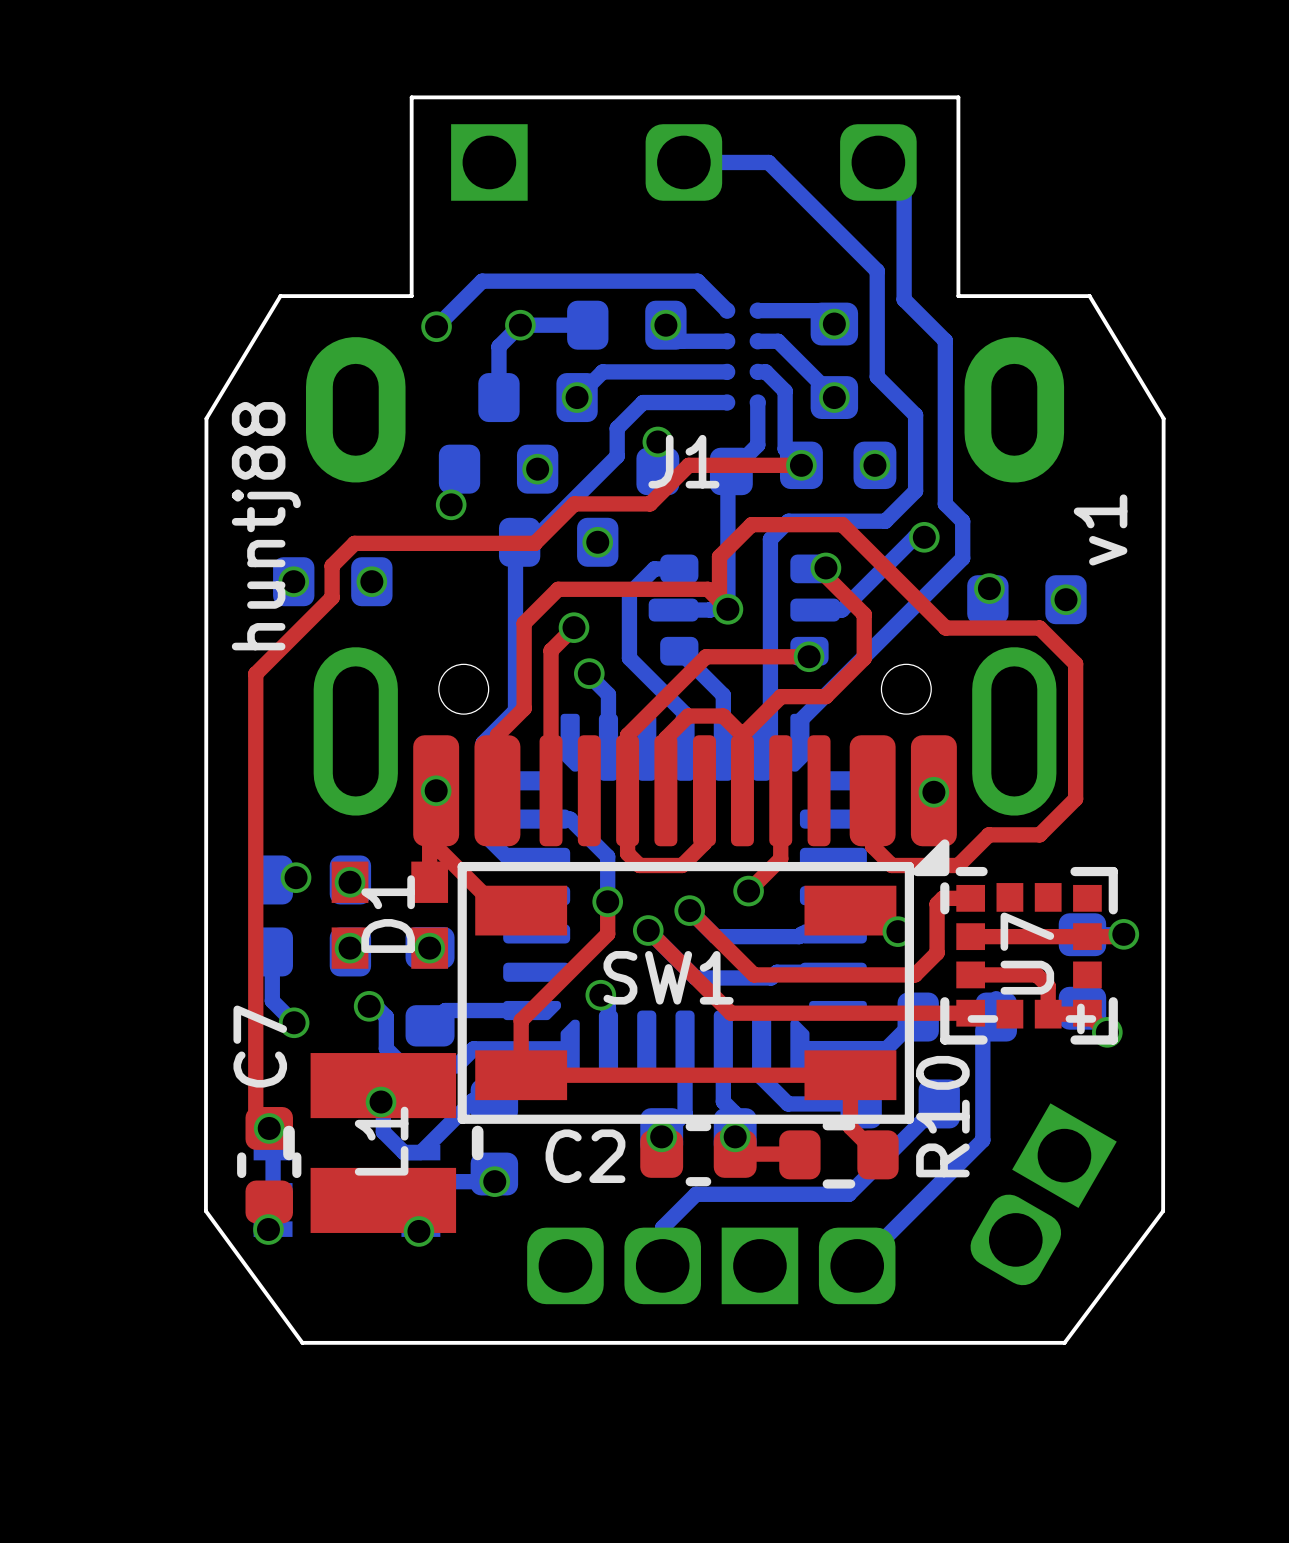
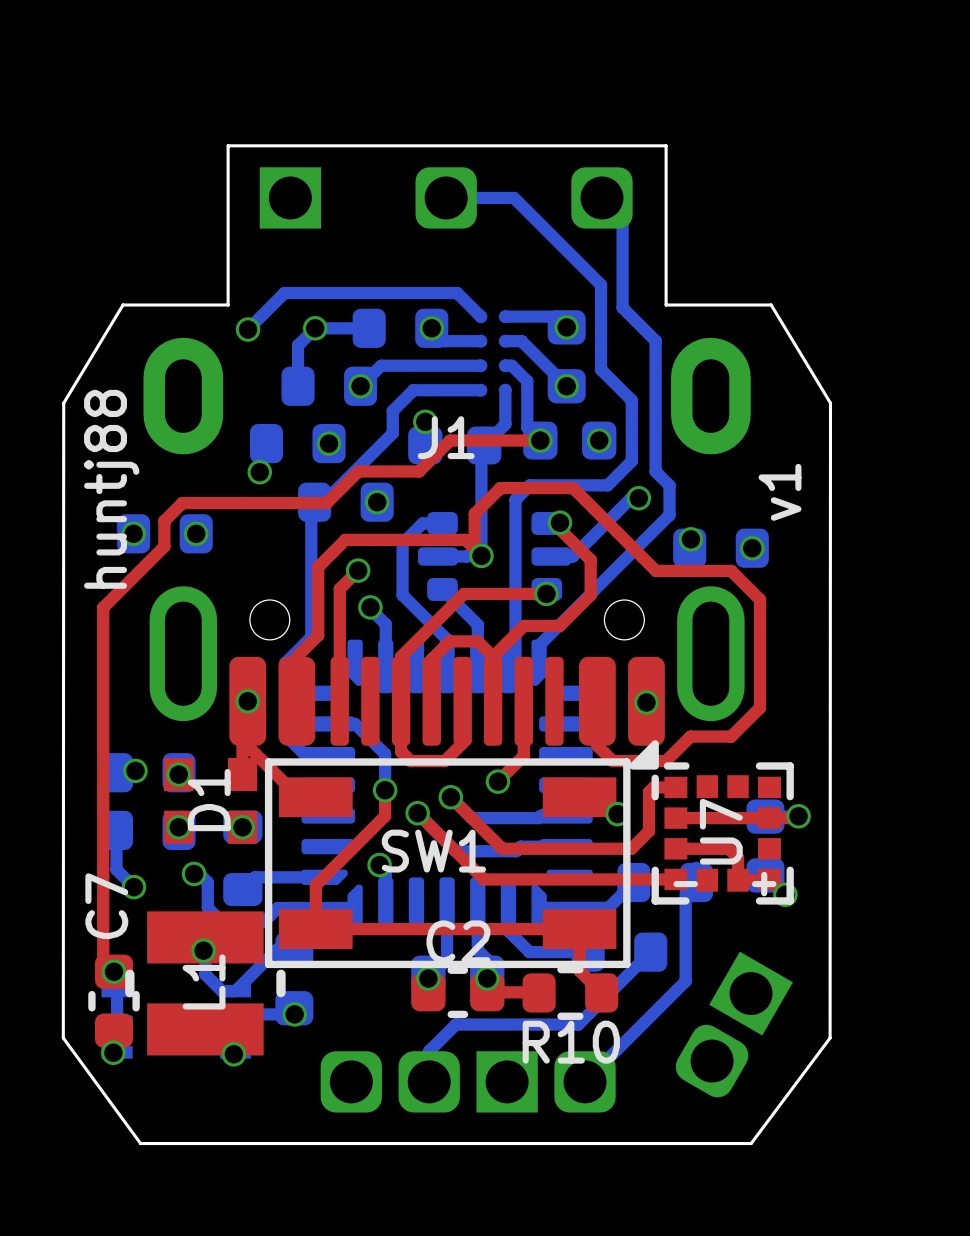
R10 name rotation: 0° (942, 1116) -> 90° clockwise (571, 1042)
C2 name position: C2 (585, 1156) -> C2 (458, 941)

